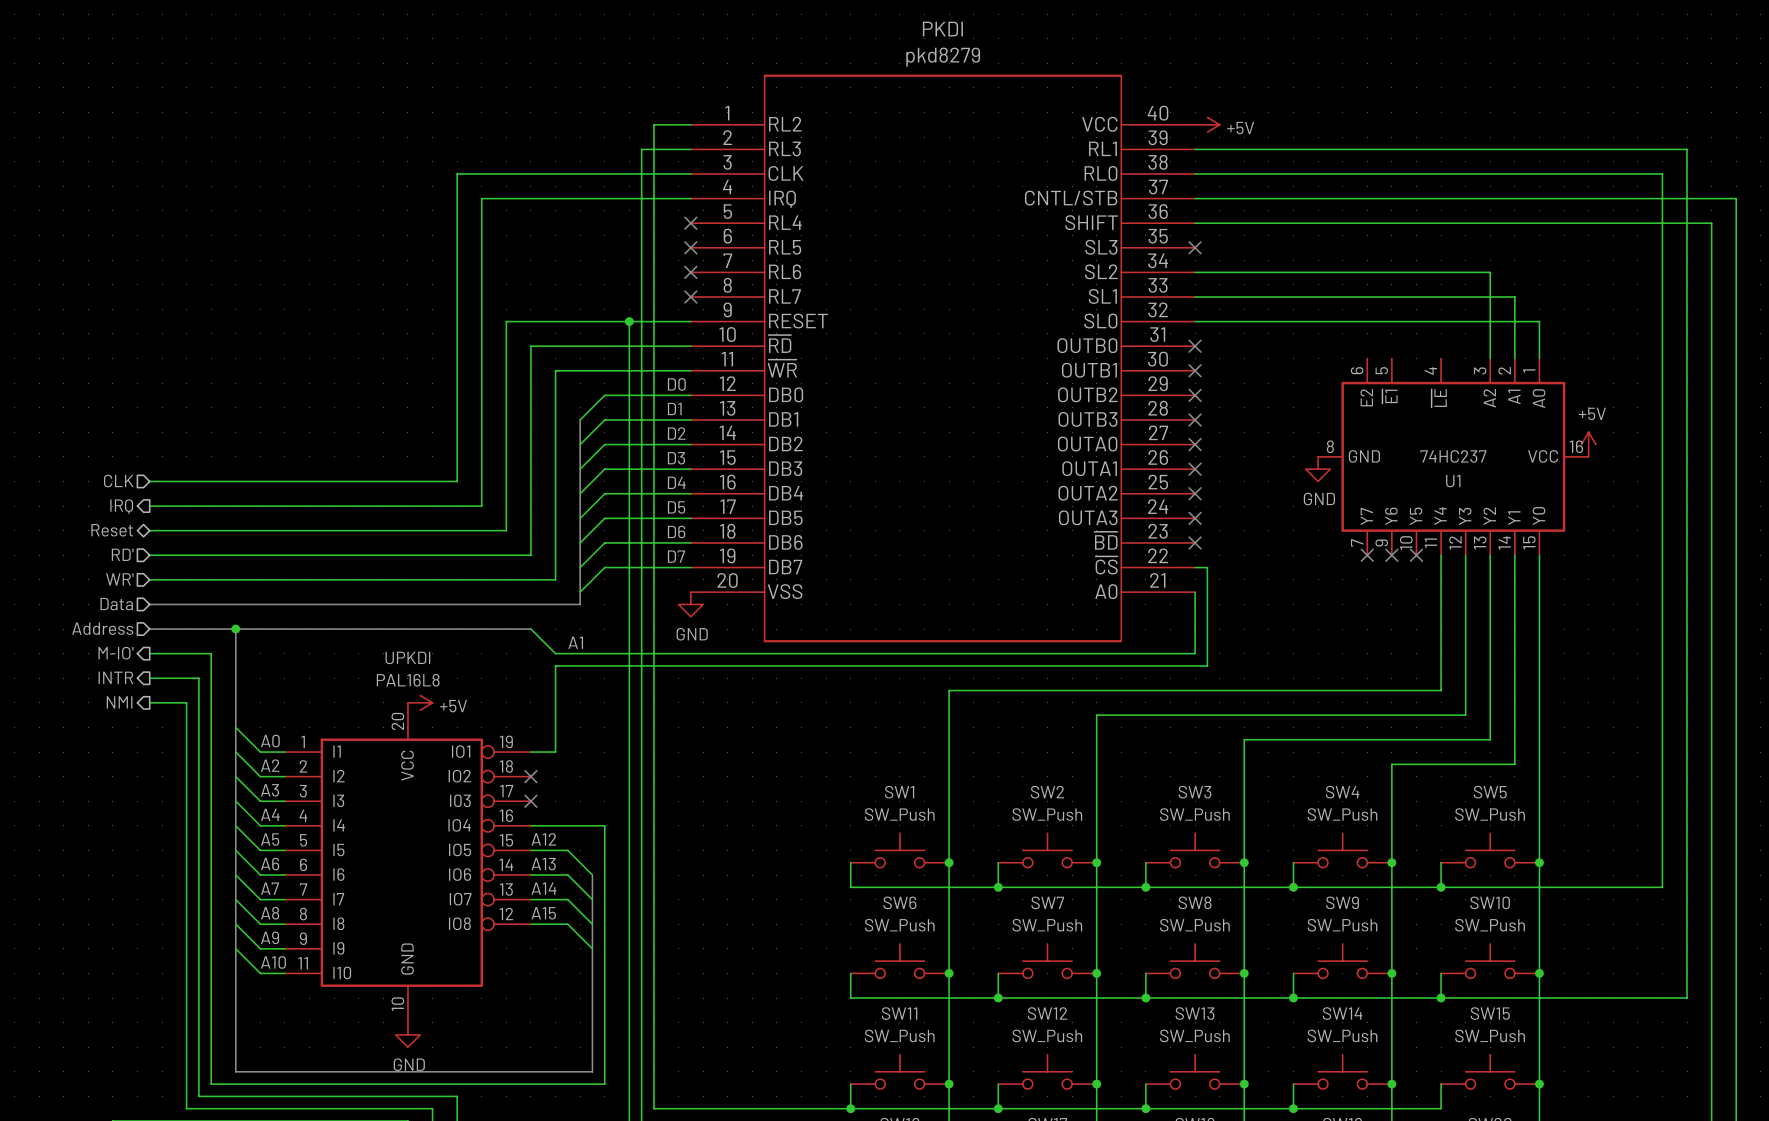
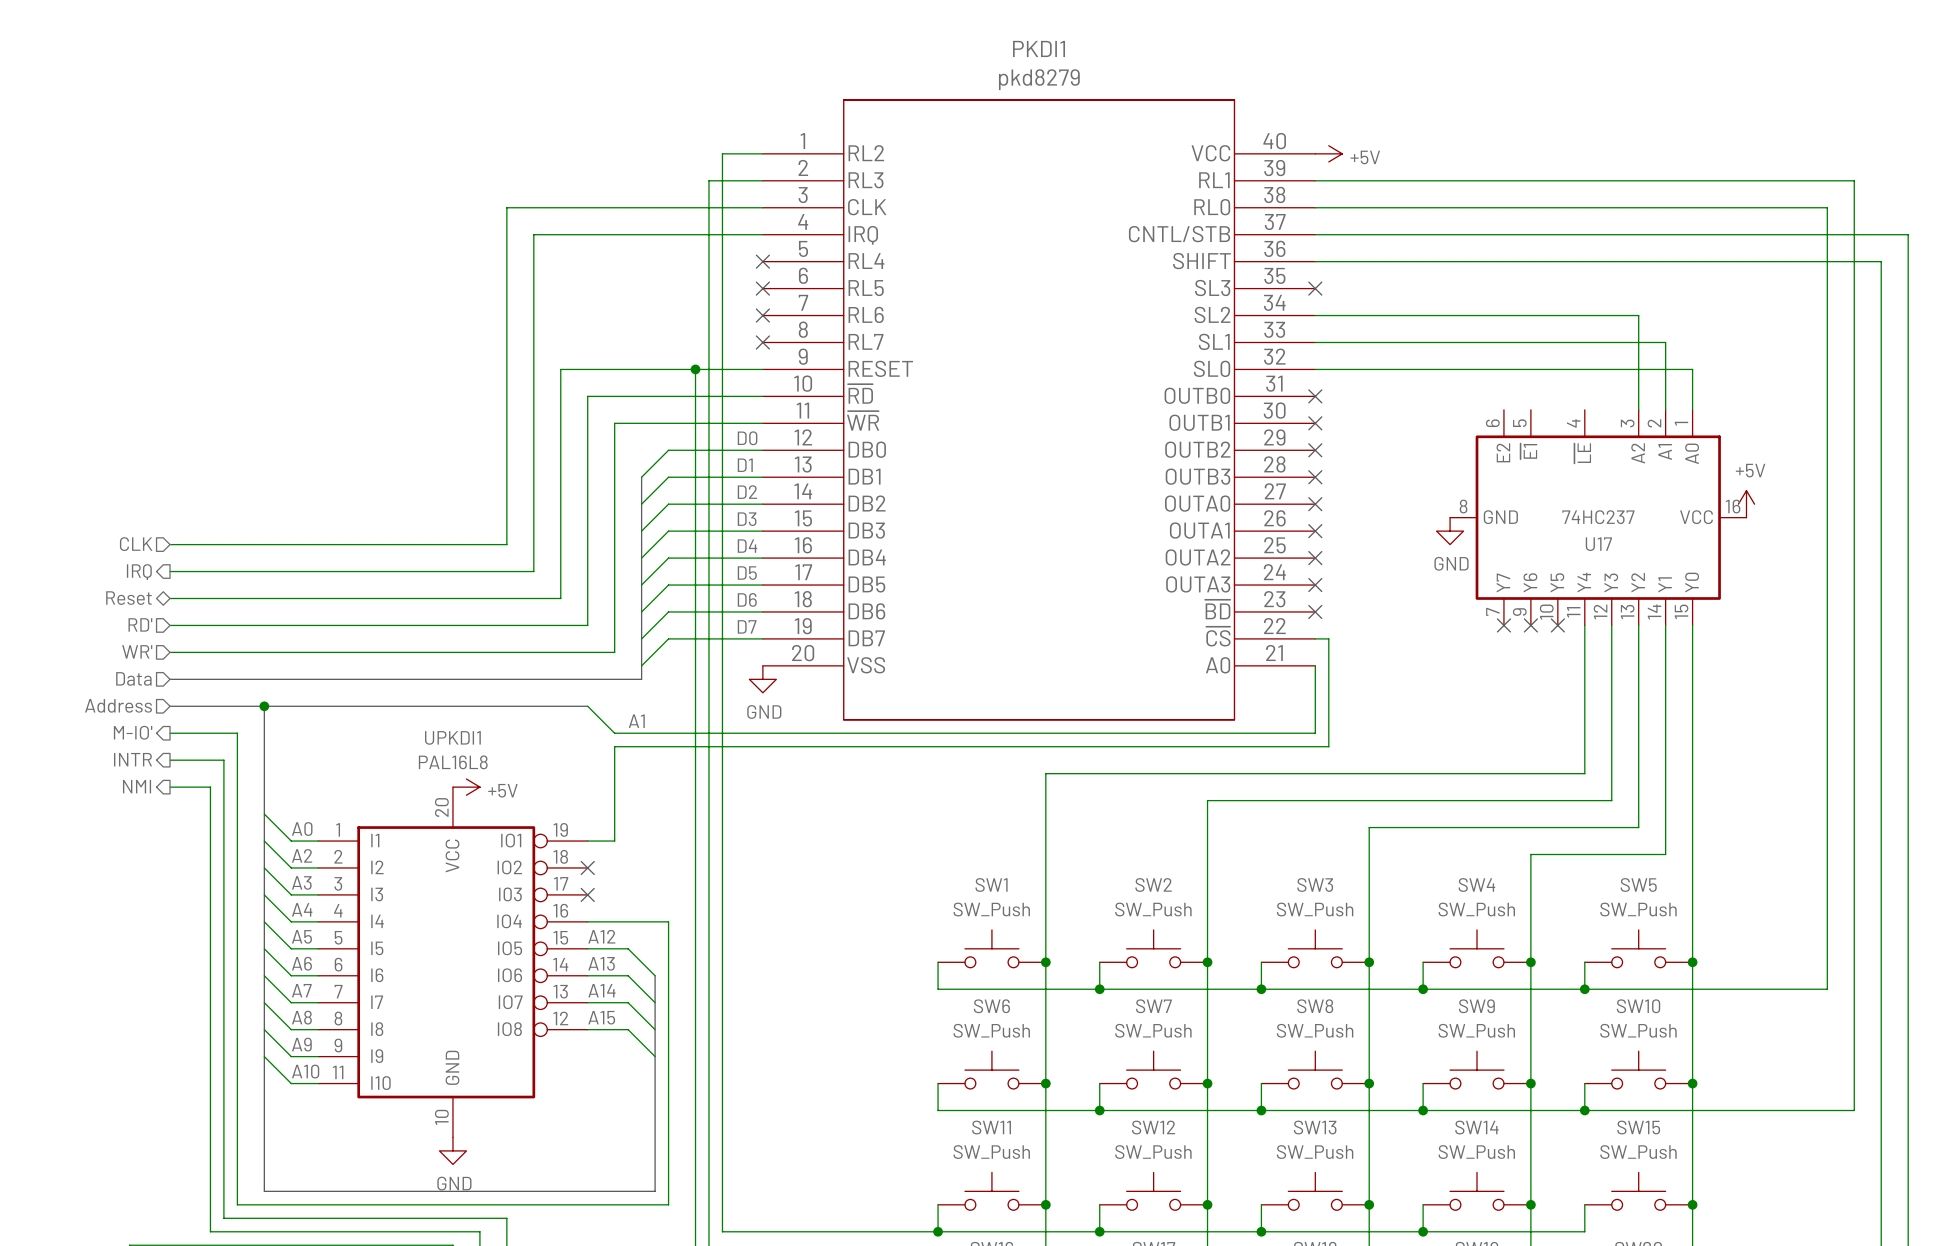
PKDI name: PKDI (942, 29) -> PKDI1 (1039, 48)
U1 name: U1 (1453, 481) -> U17 (1598, 544)
UPKDI name: UPKDI (407, 657) -> UPKDI1 (452, 737)

